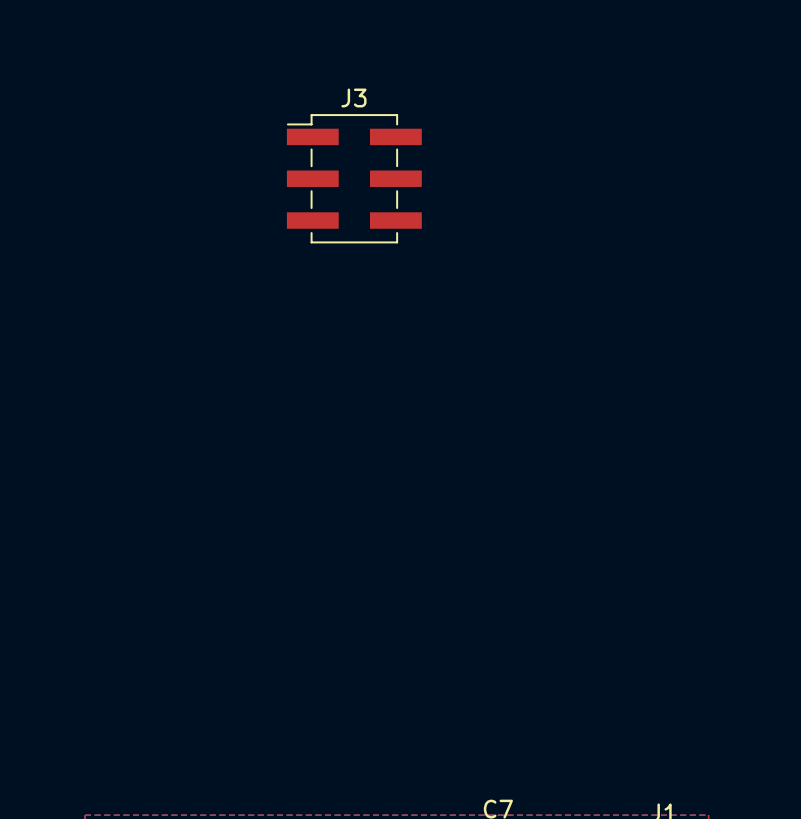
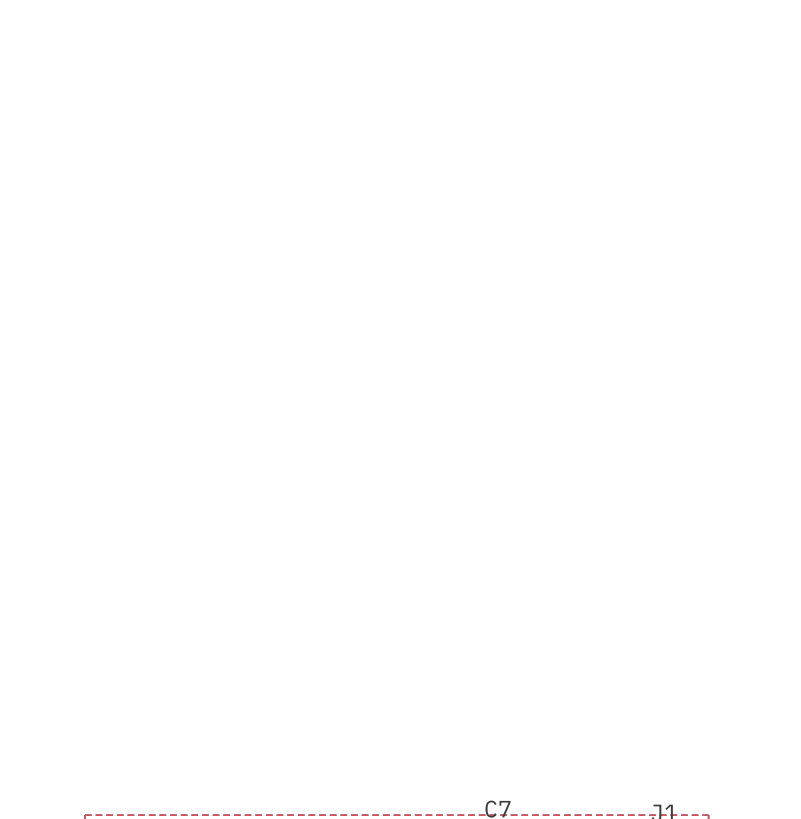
J3: (354, 178) -> none

